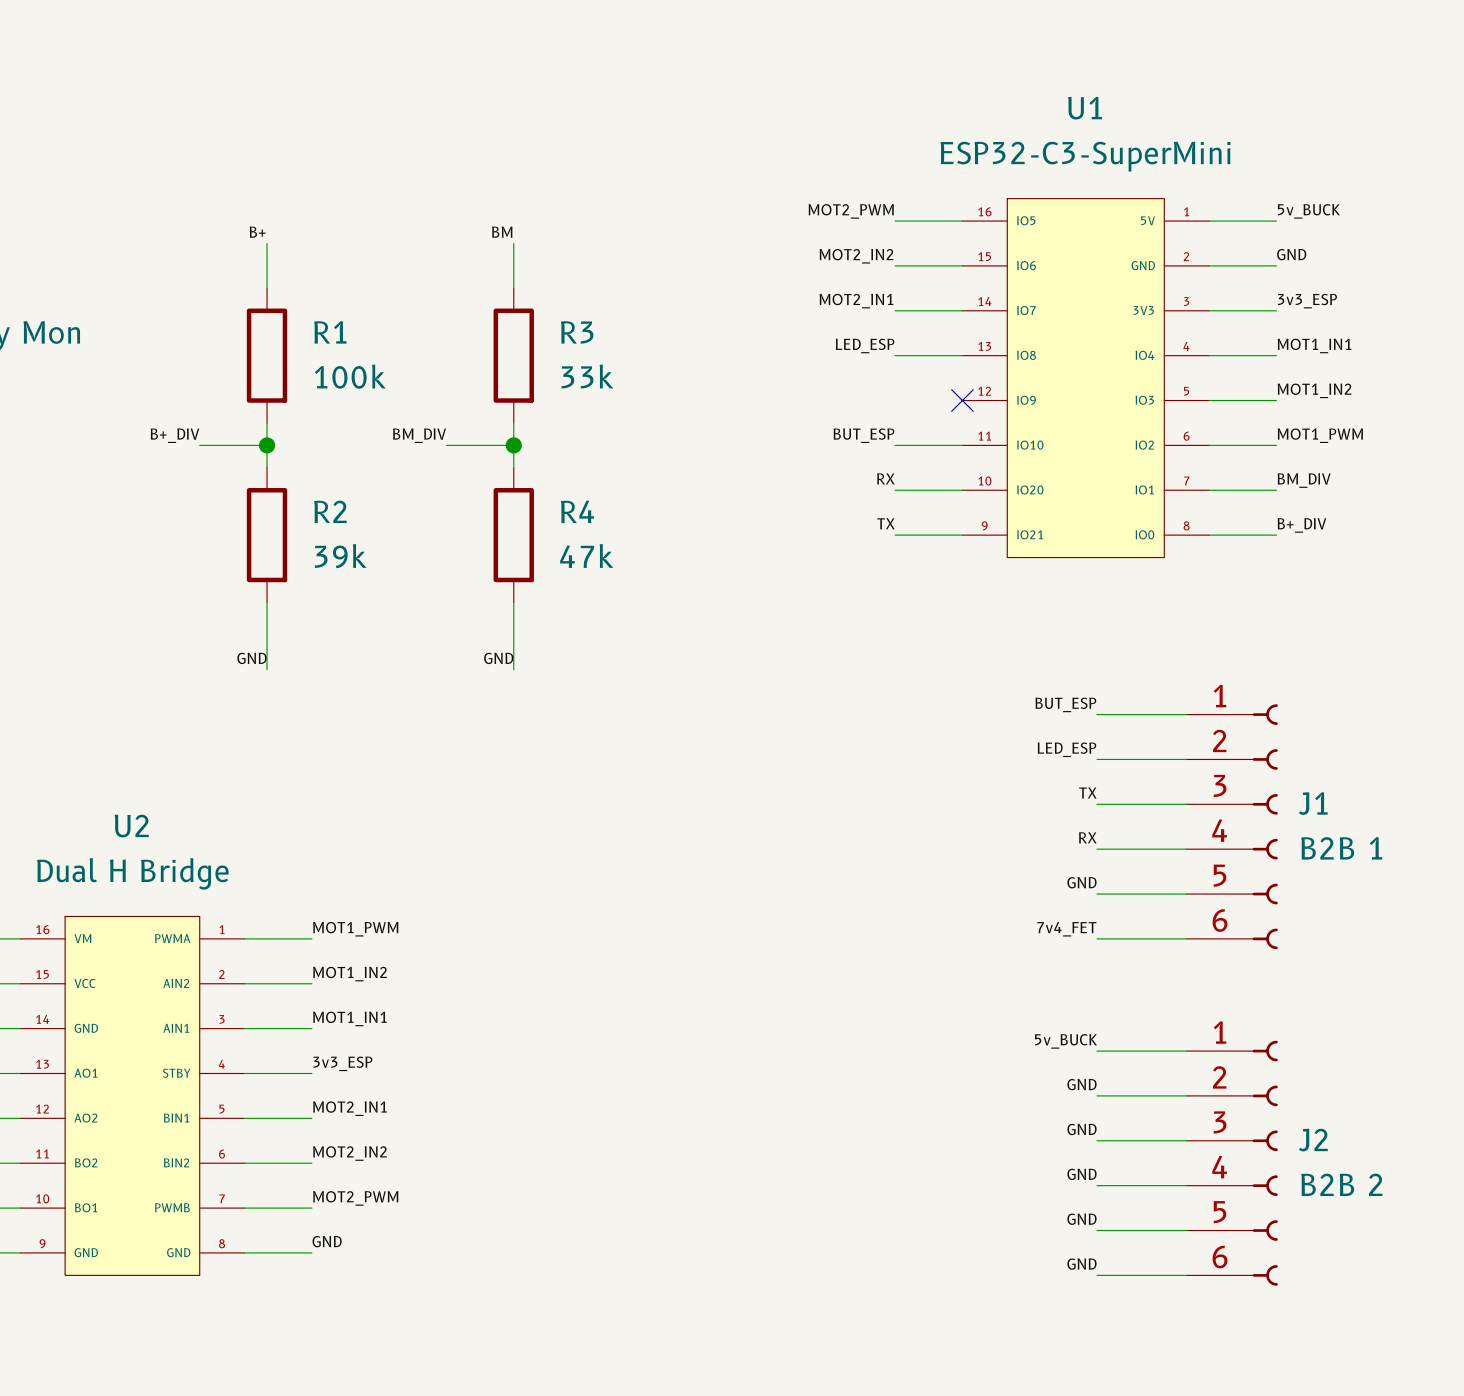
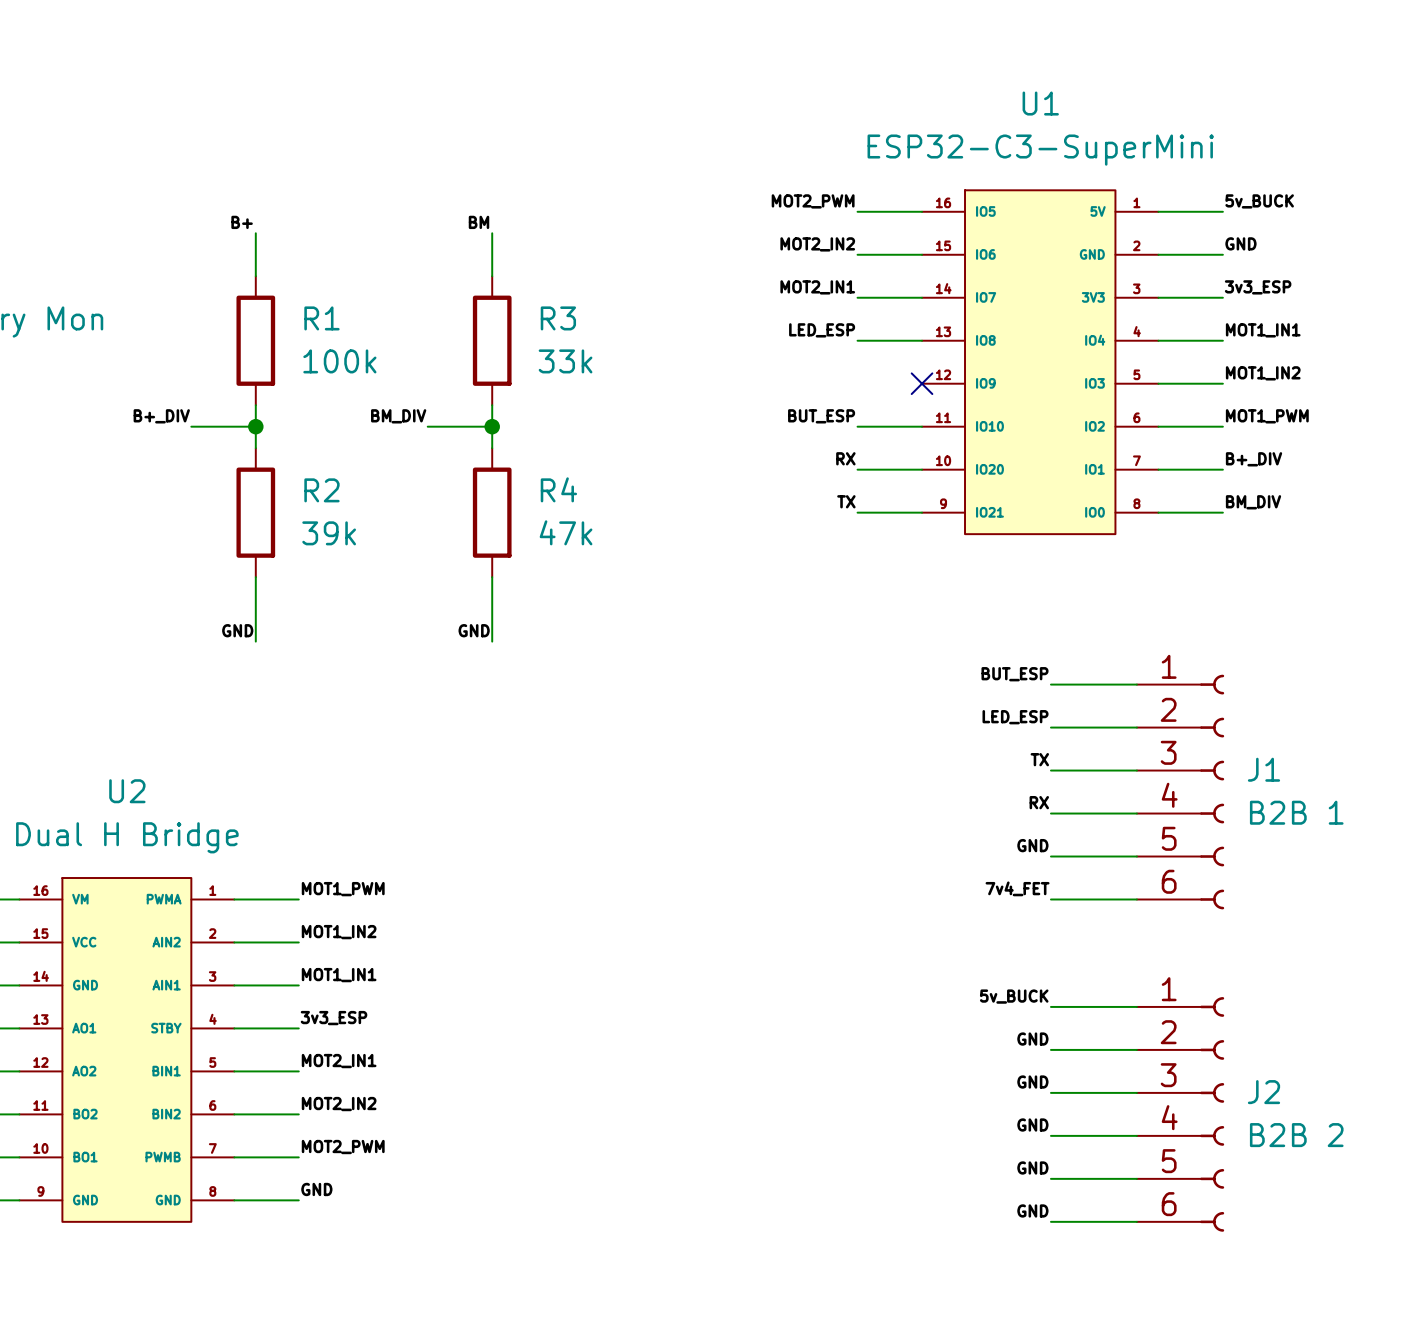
label: BM_DIV (1304, 480) -> B+_DIV (1254, 459)
label: B+_DIV (1301, 525) -> BM_DIV (1253, 502)

